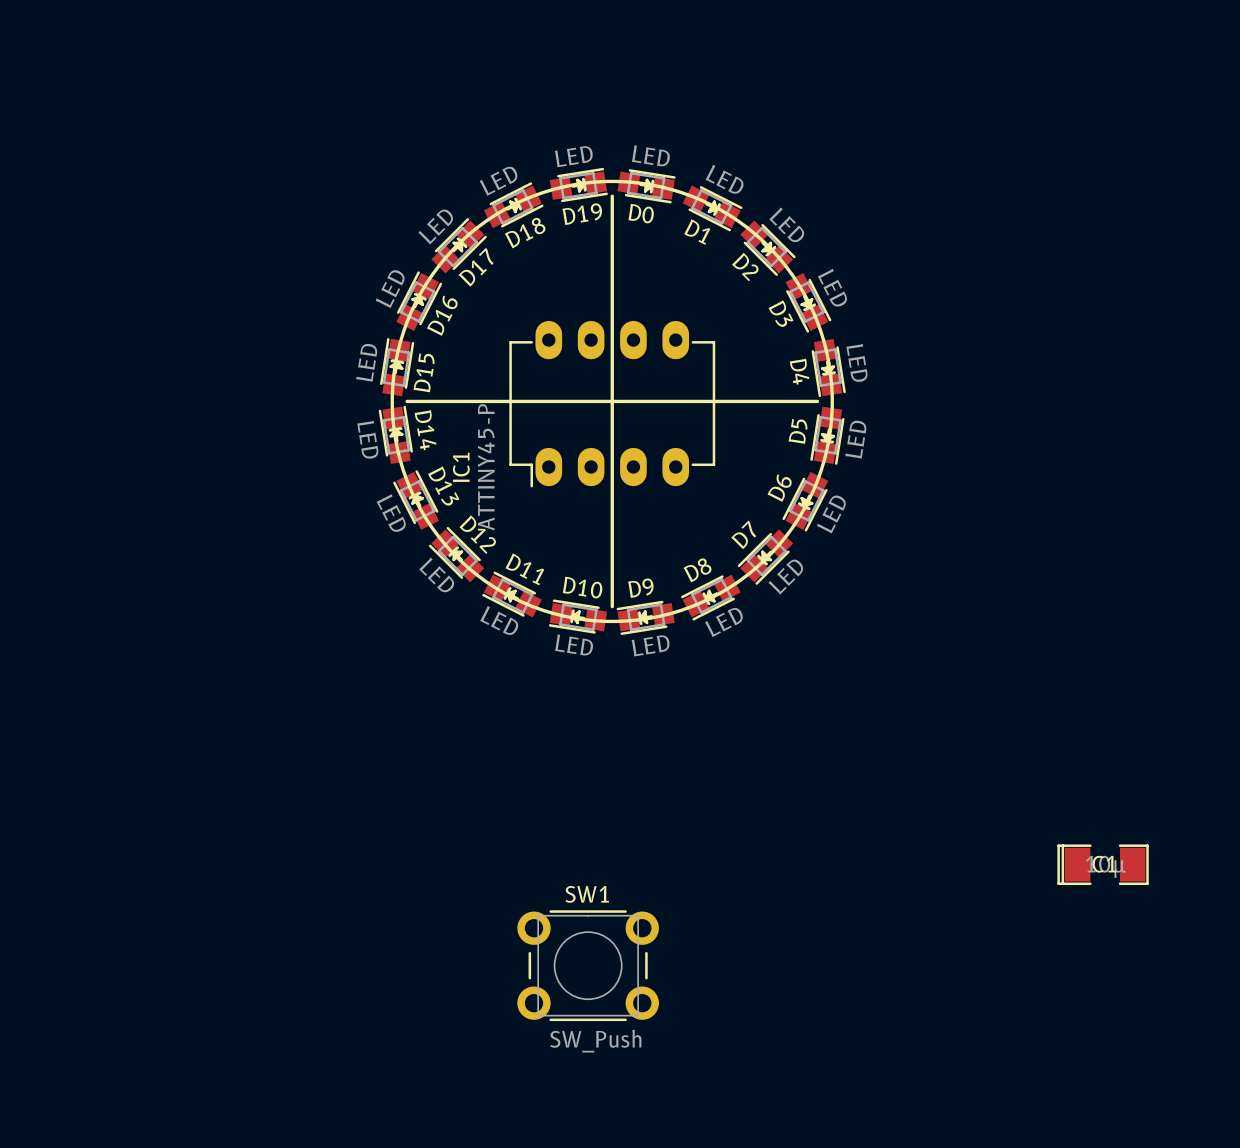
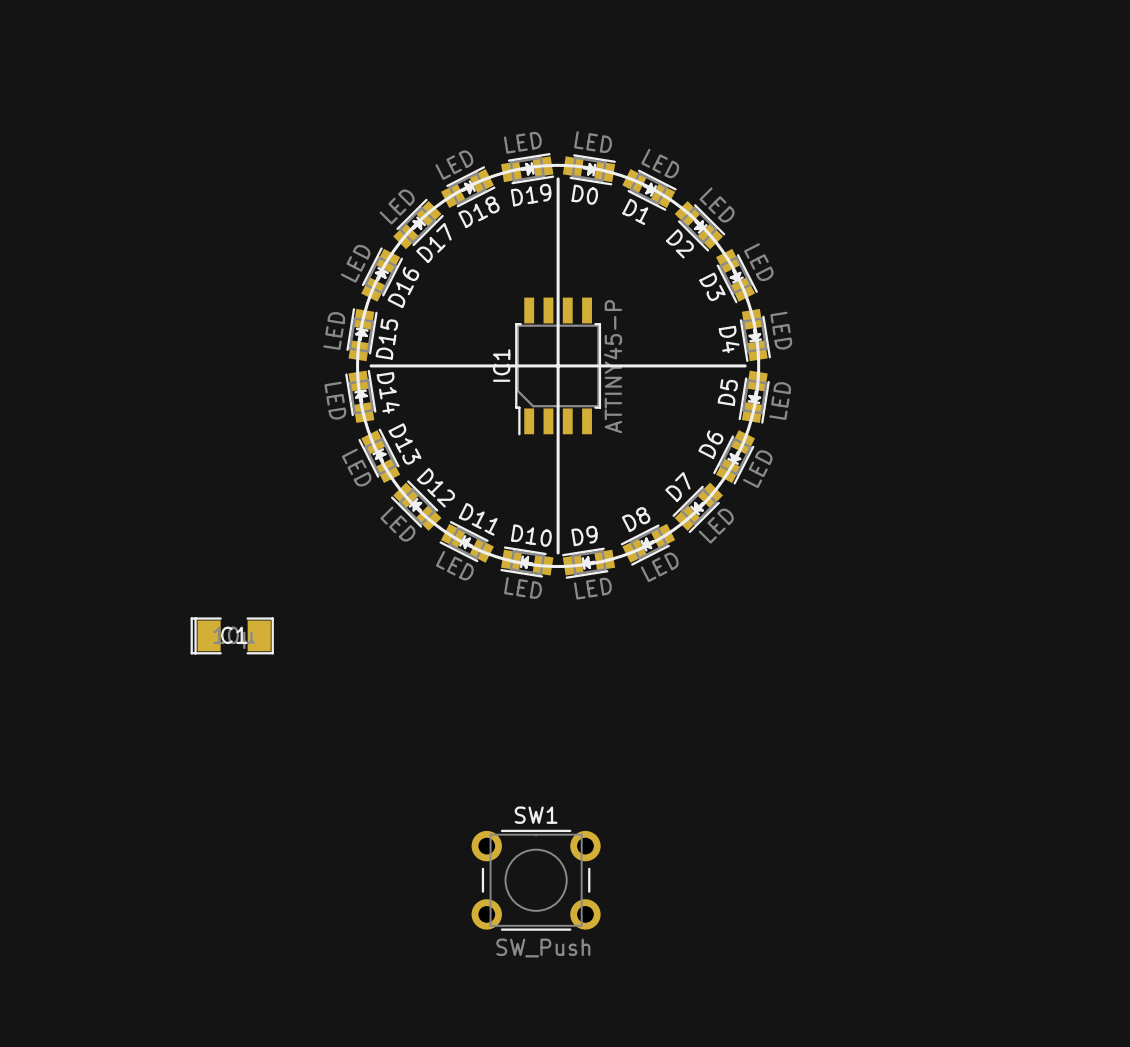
IC1 footprint: [509, 320, 716, 488] -> [515, 297, 602, 436]
IC1 name position: IC1 (461, 467) -> IC1 (501, 365)
IC1 value position: ATTINY45-P (486, 467) -> ATTINY45-P (613, 366)
C1 position: (1103, 864) -> (232, 635)

